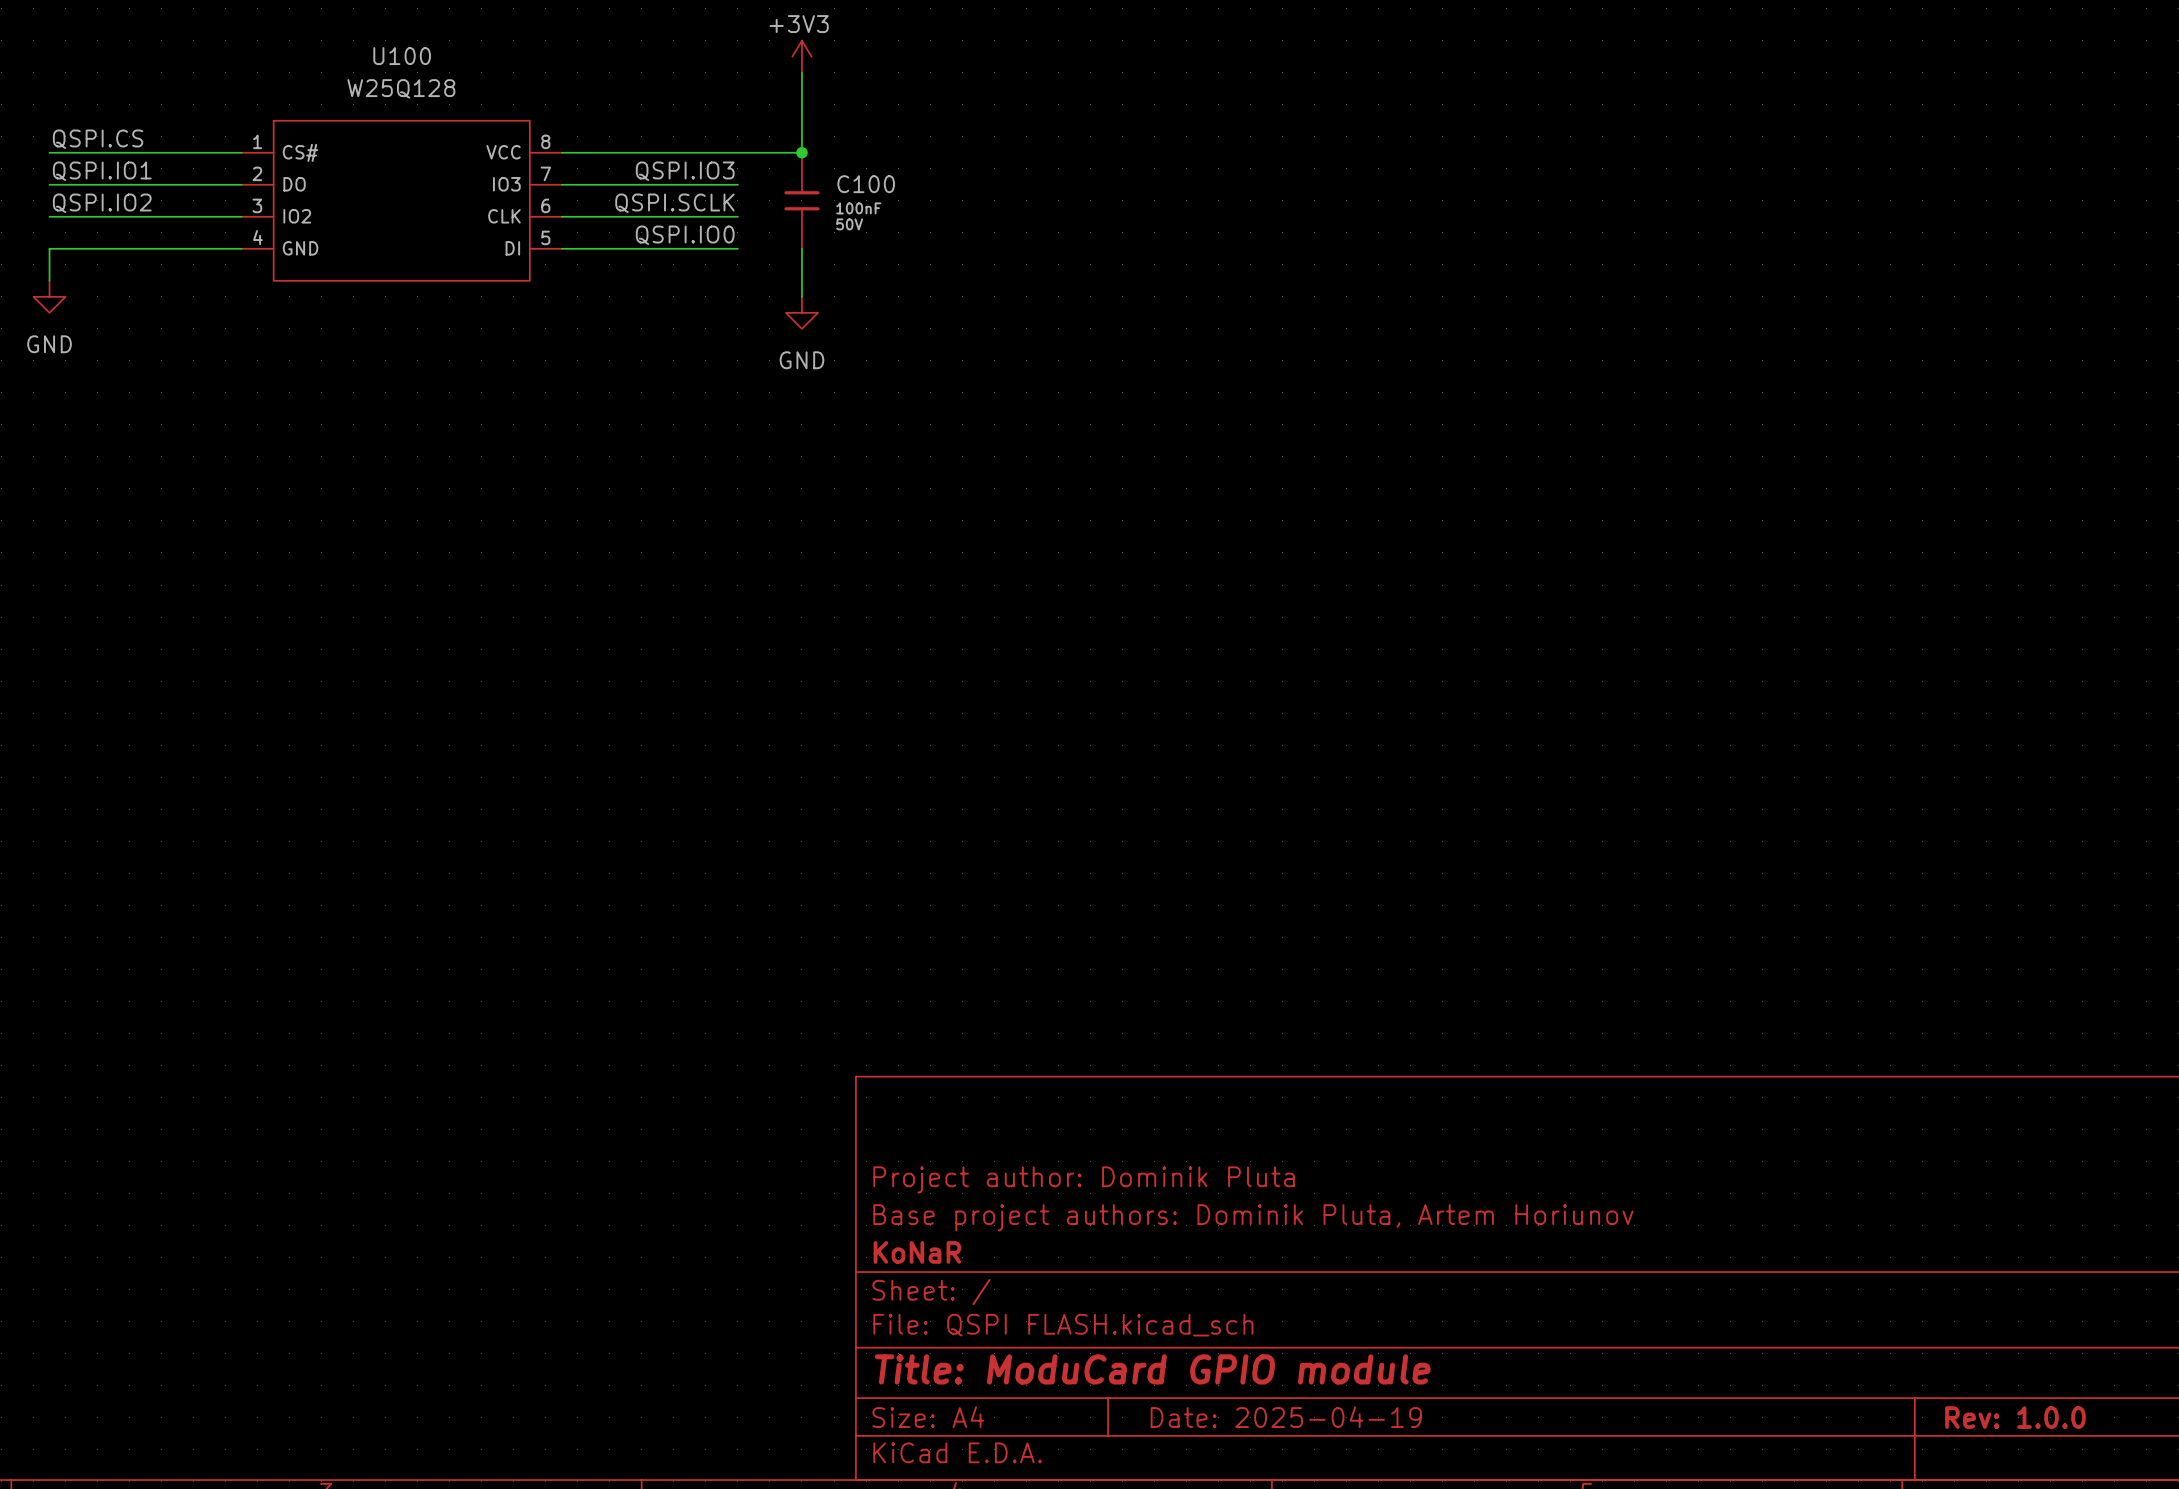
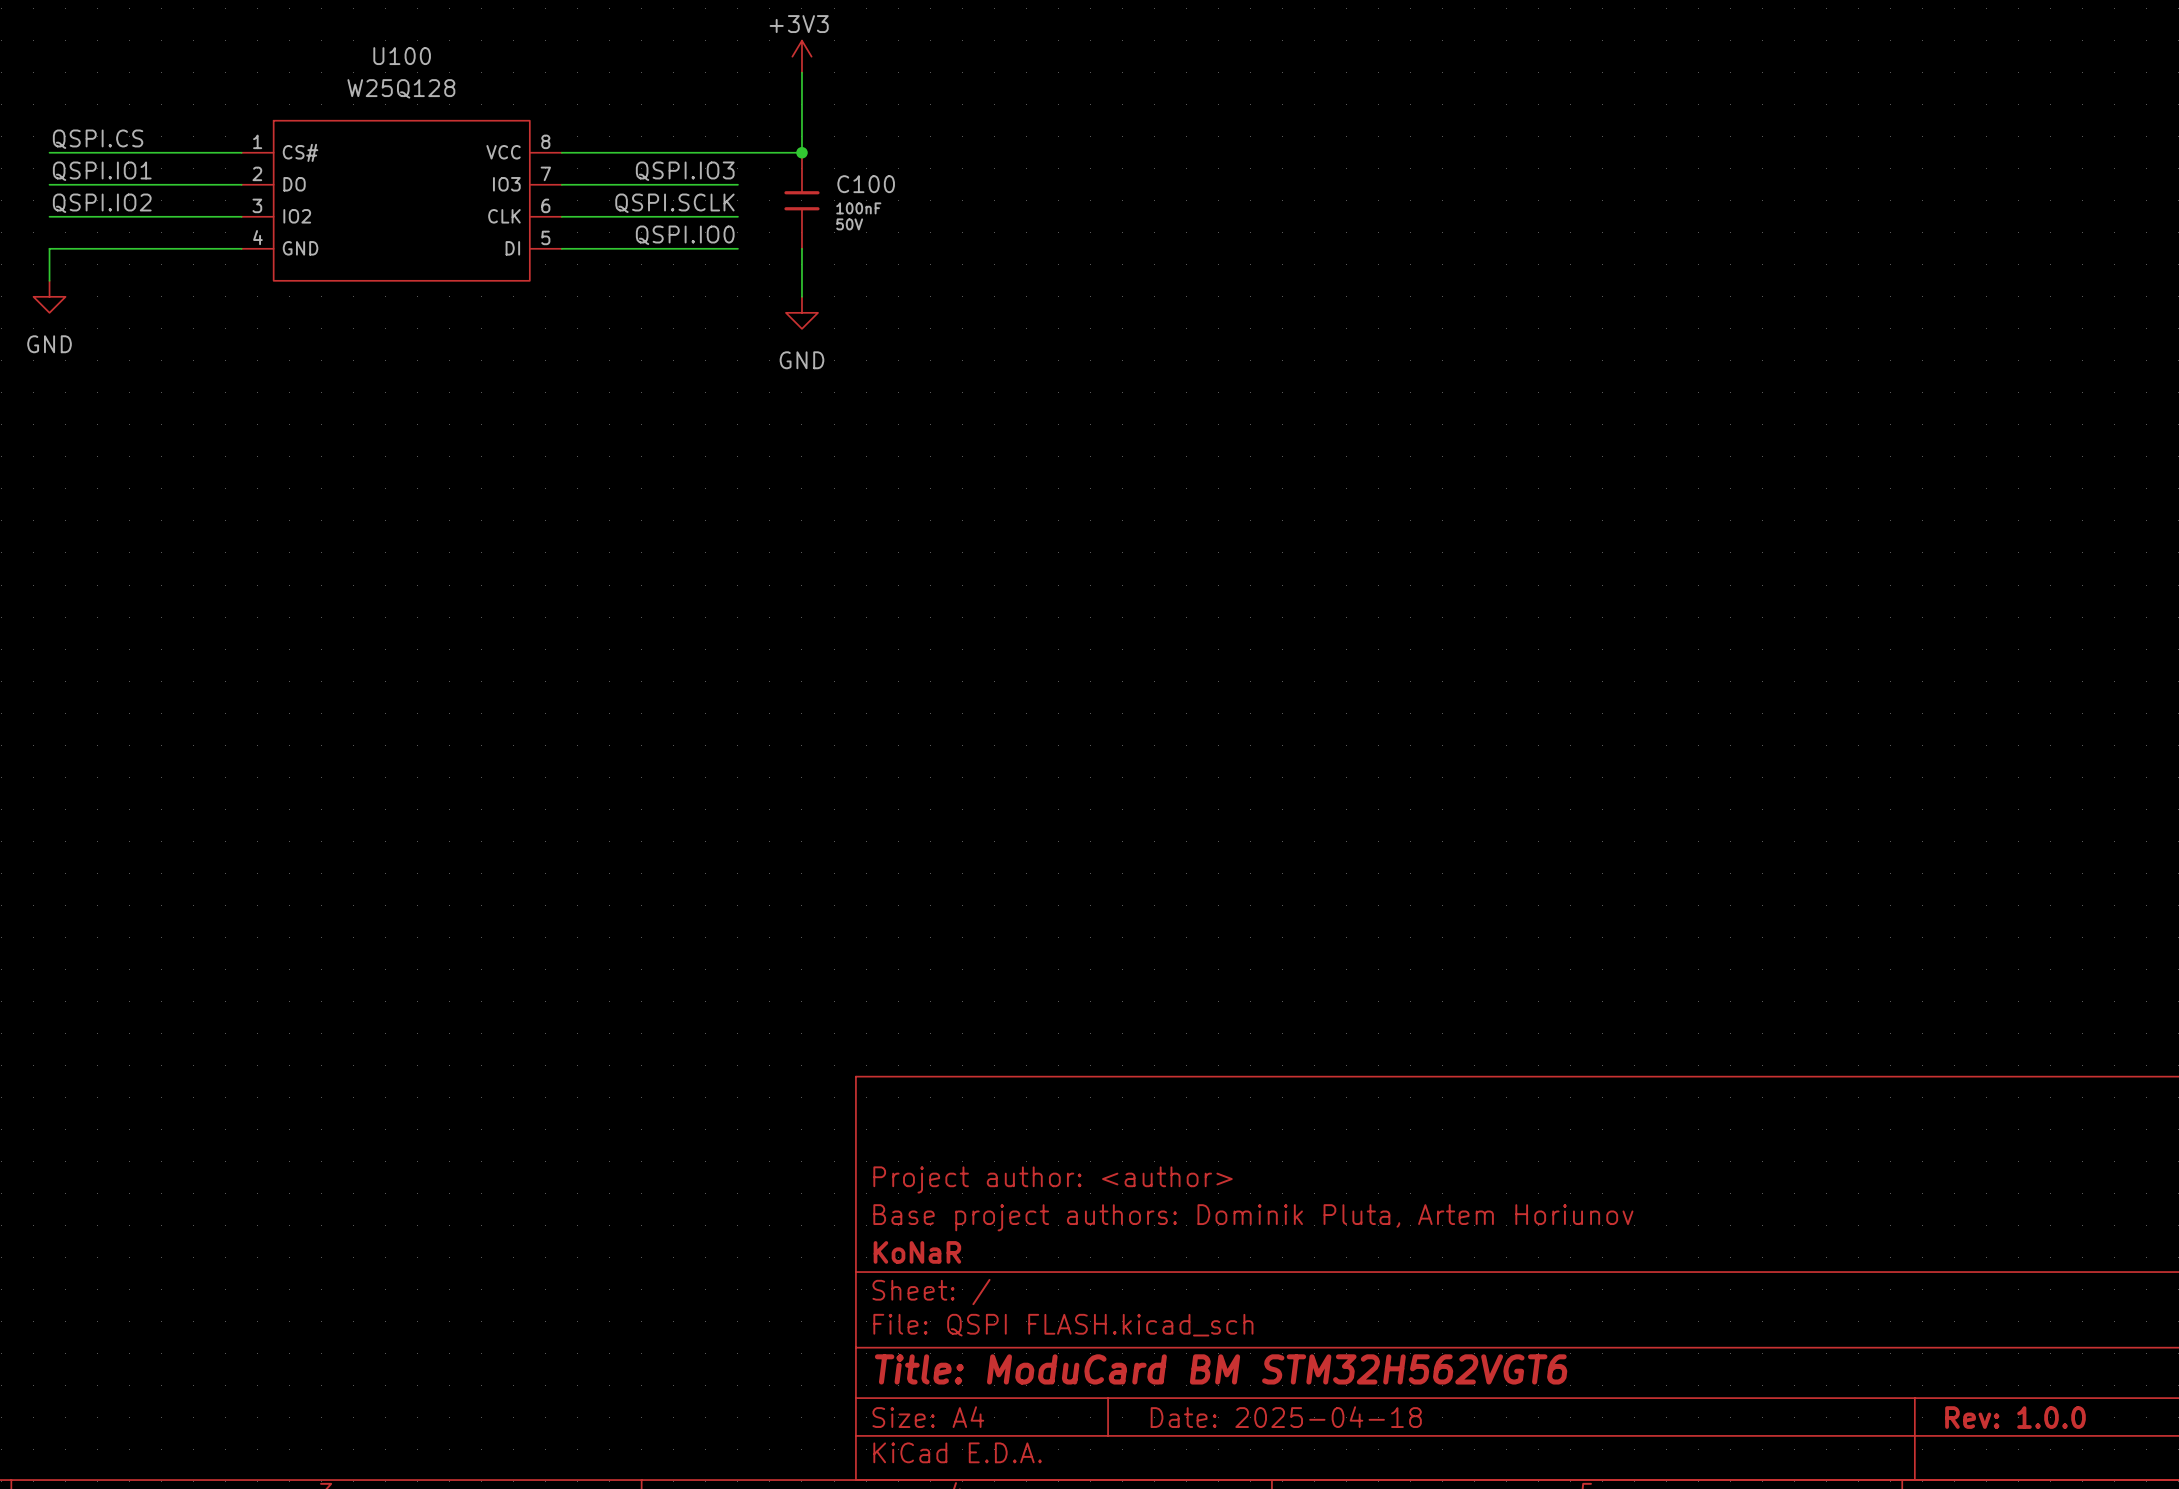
title block: Project author: Dominik Pluta (1084, 1179) -> Project author: <author> (1053, 1179)
title block: Title: ModuCard GPIO module (1152, 1369) -> Title: ModuCard BM STM32H562VGT6 (1221, 1369)
title block: Date: 2025-04-19 (1286, 1417) -> Date: 2025-04-18 (1286, 1417)

